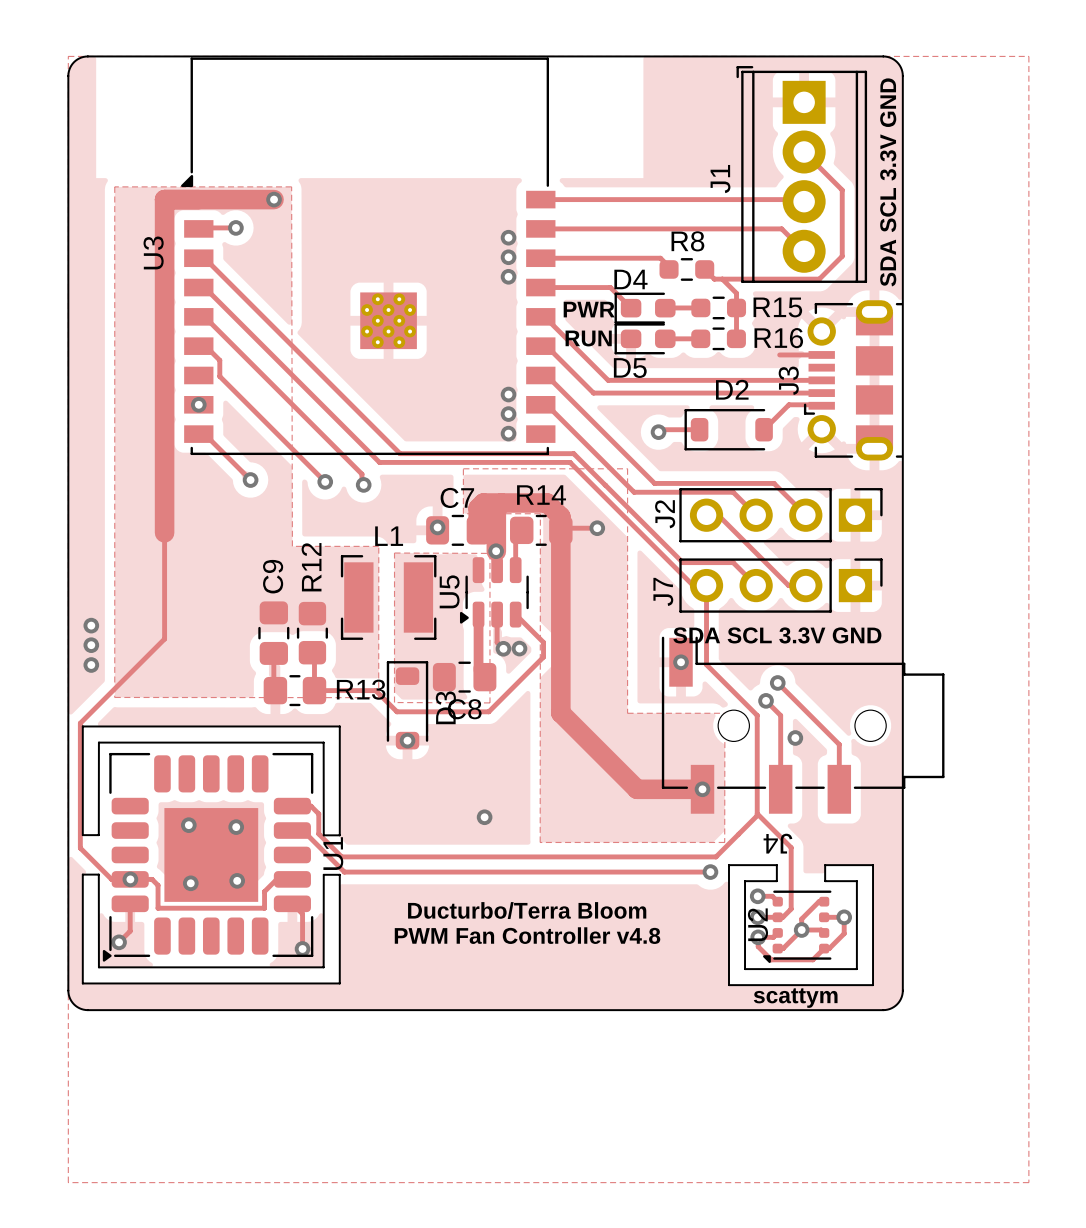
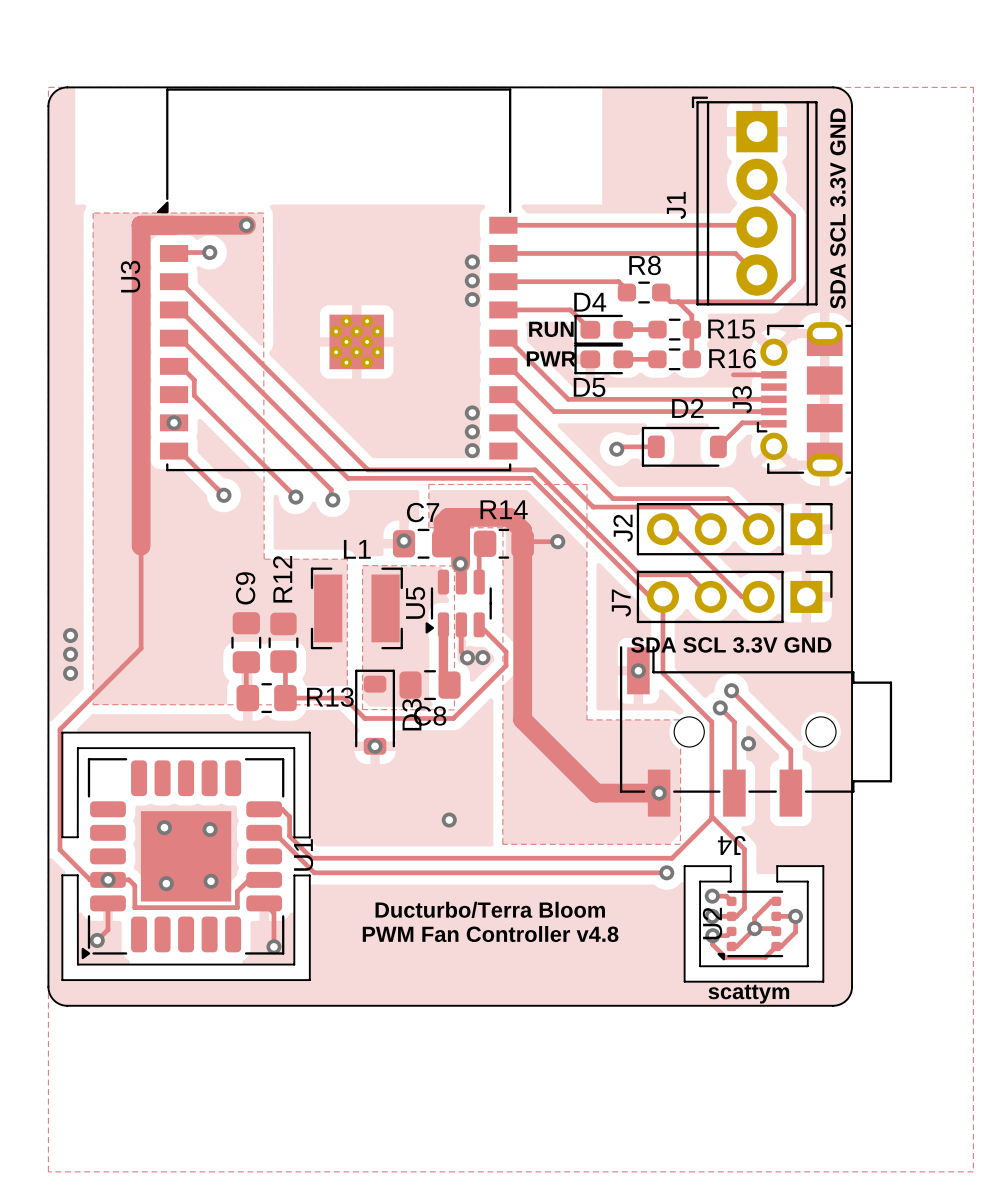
text: PWR (589, 309) -> RUN (551, 329)
text: RUN (588, 338) -> PWR (551, 358)

